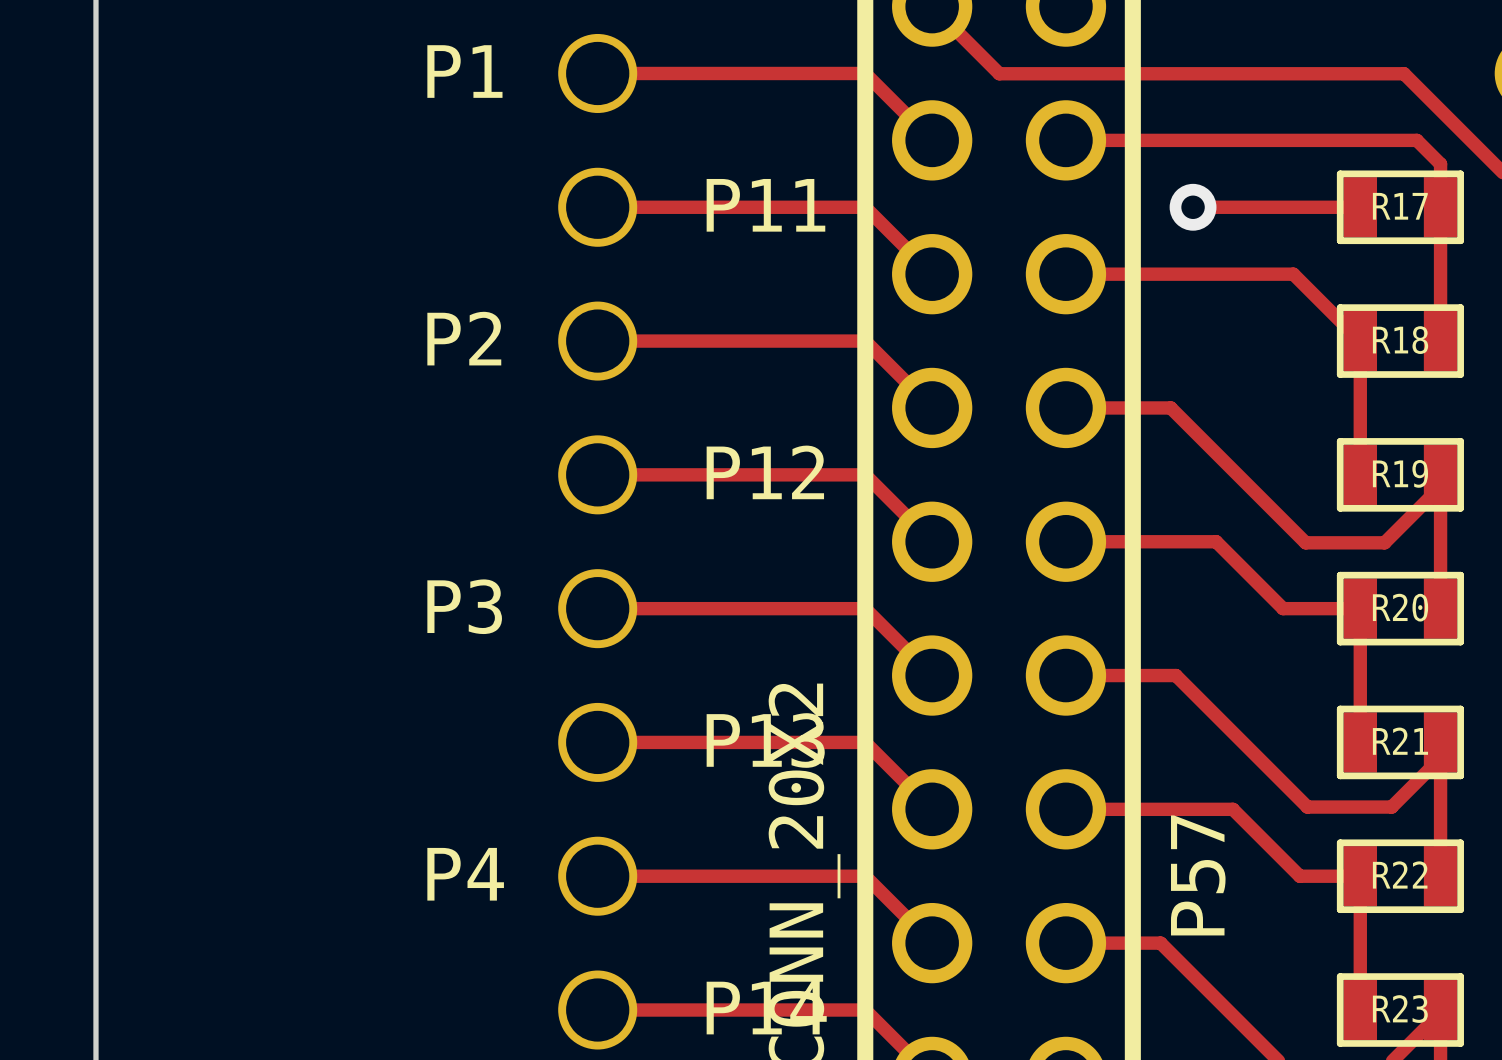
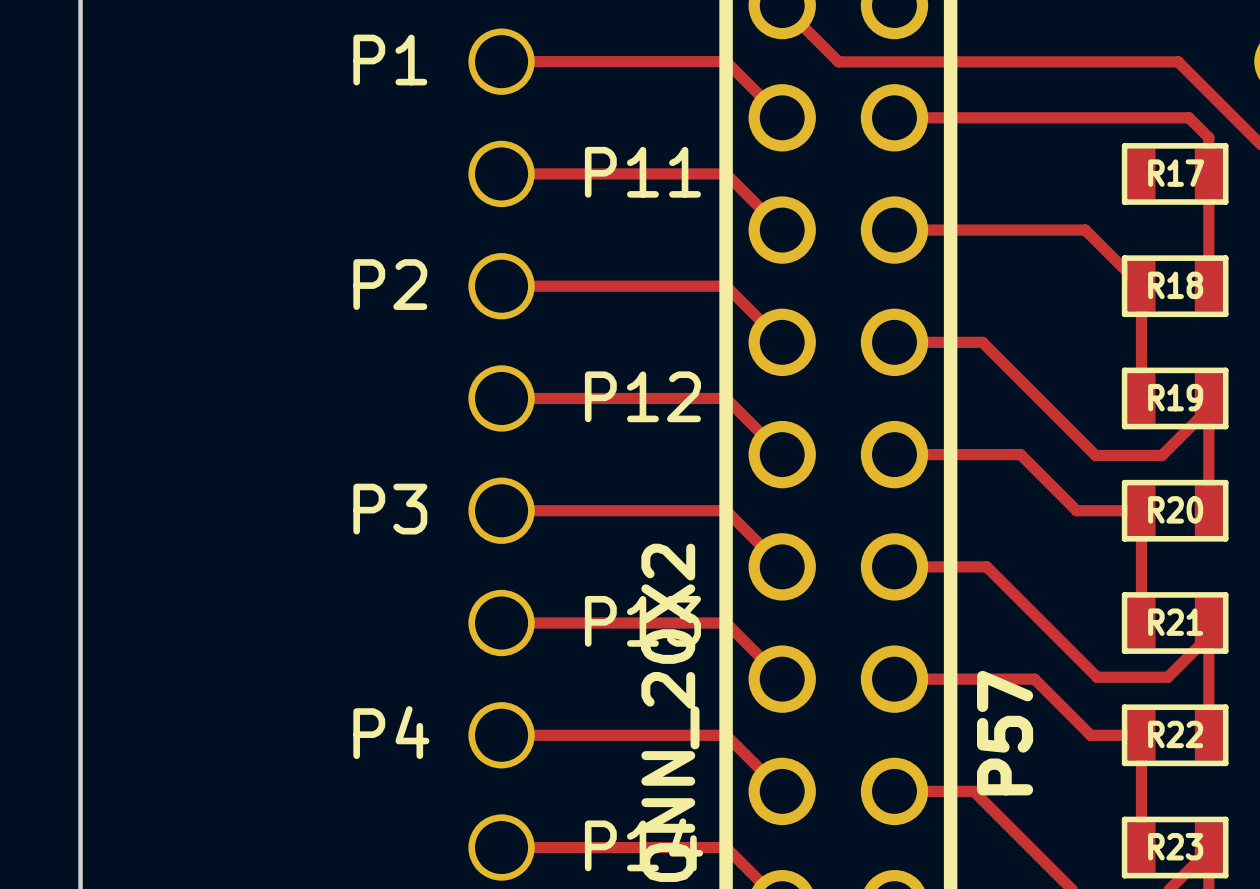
track: (1193, 207) (1360, 207) -> none
via: (1193, 207) -> none

